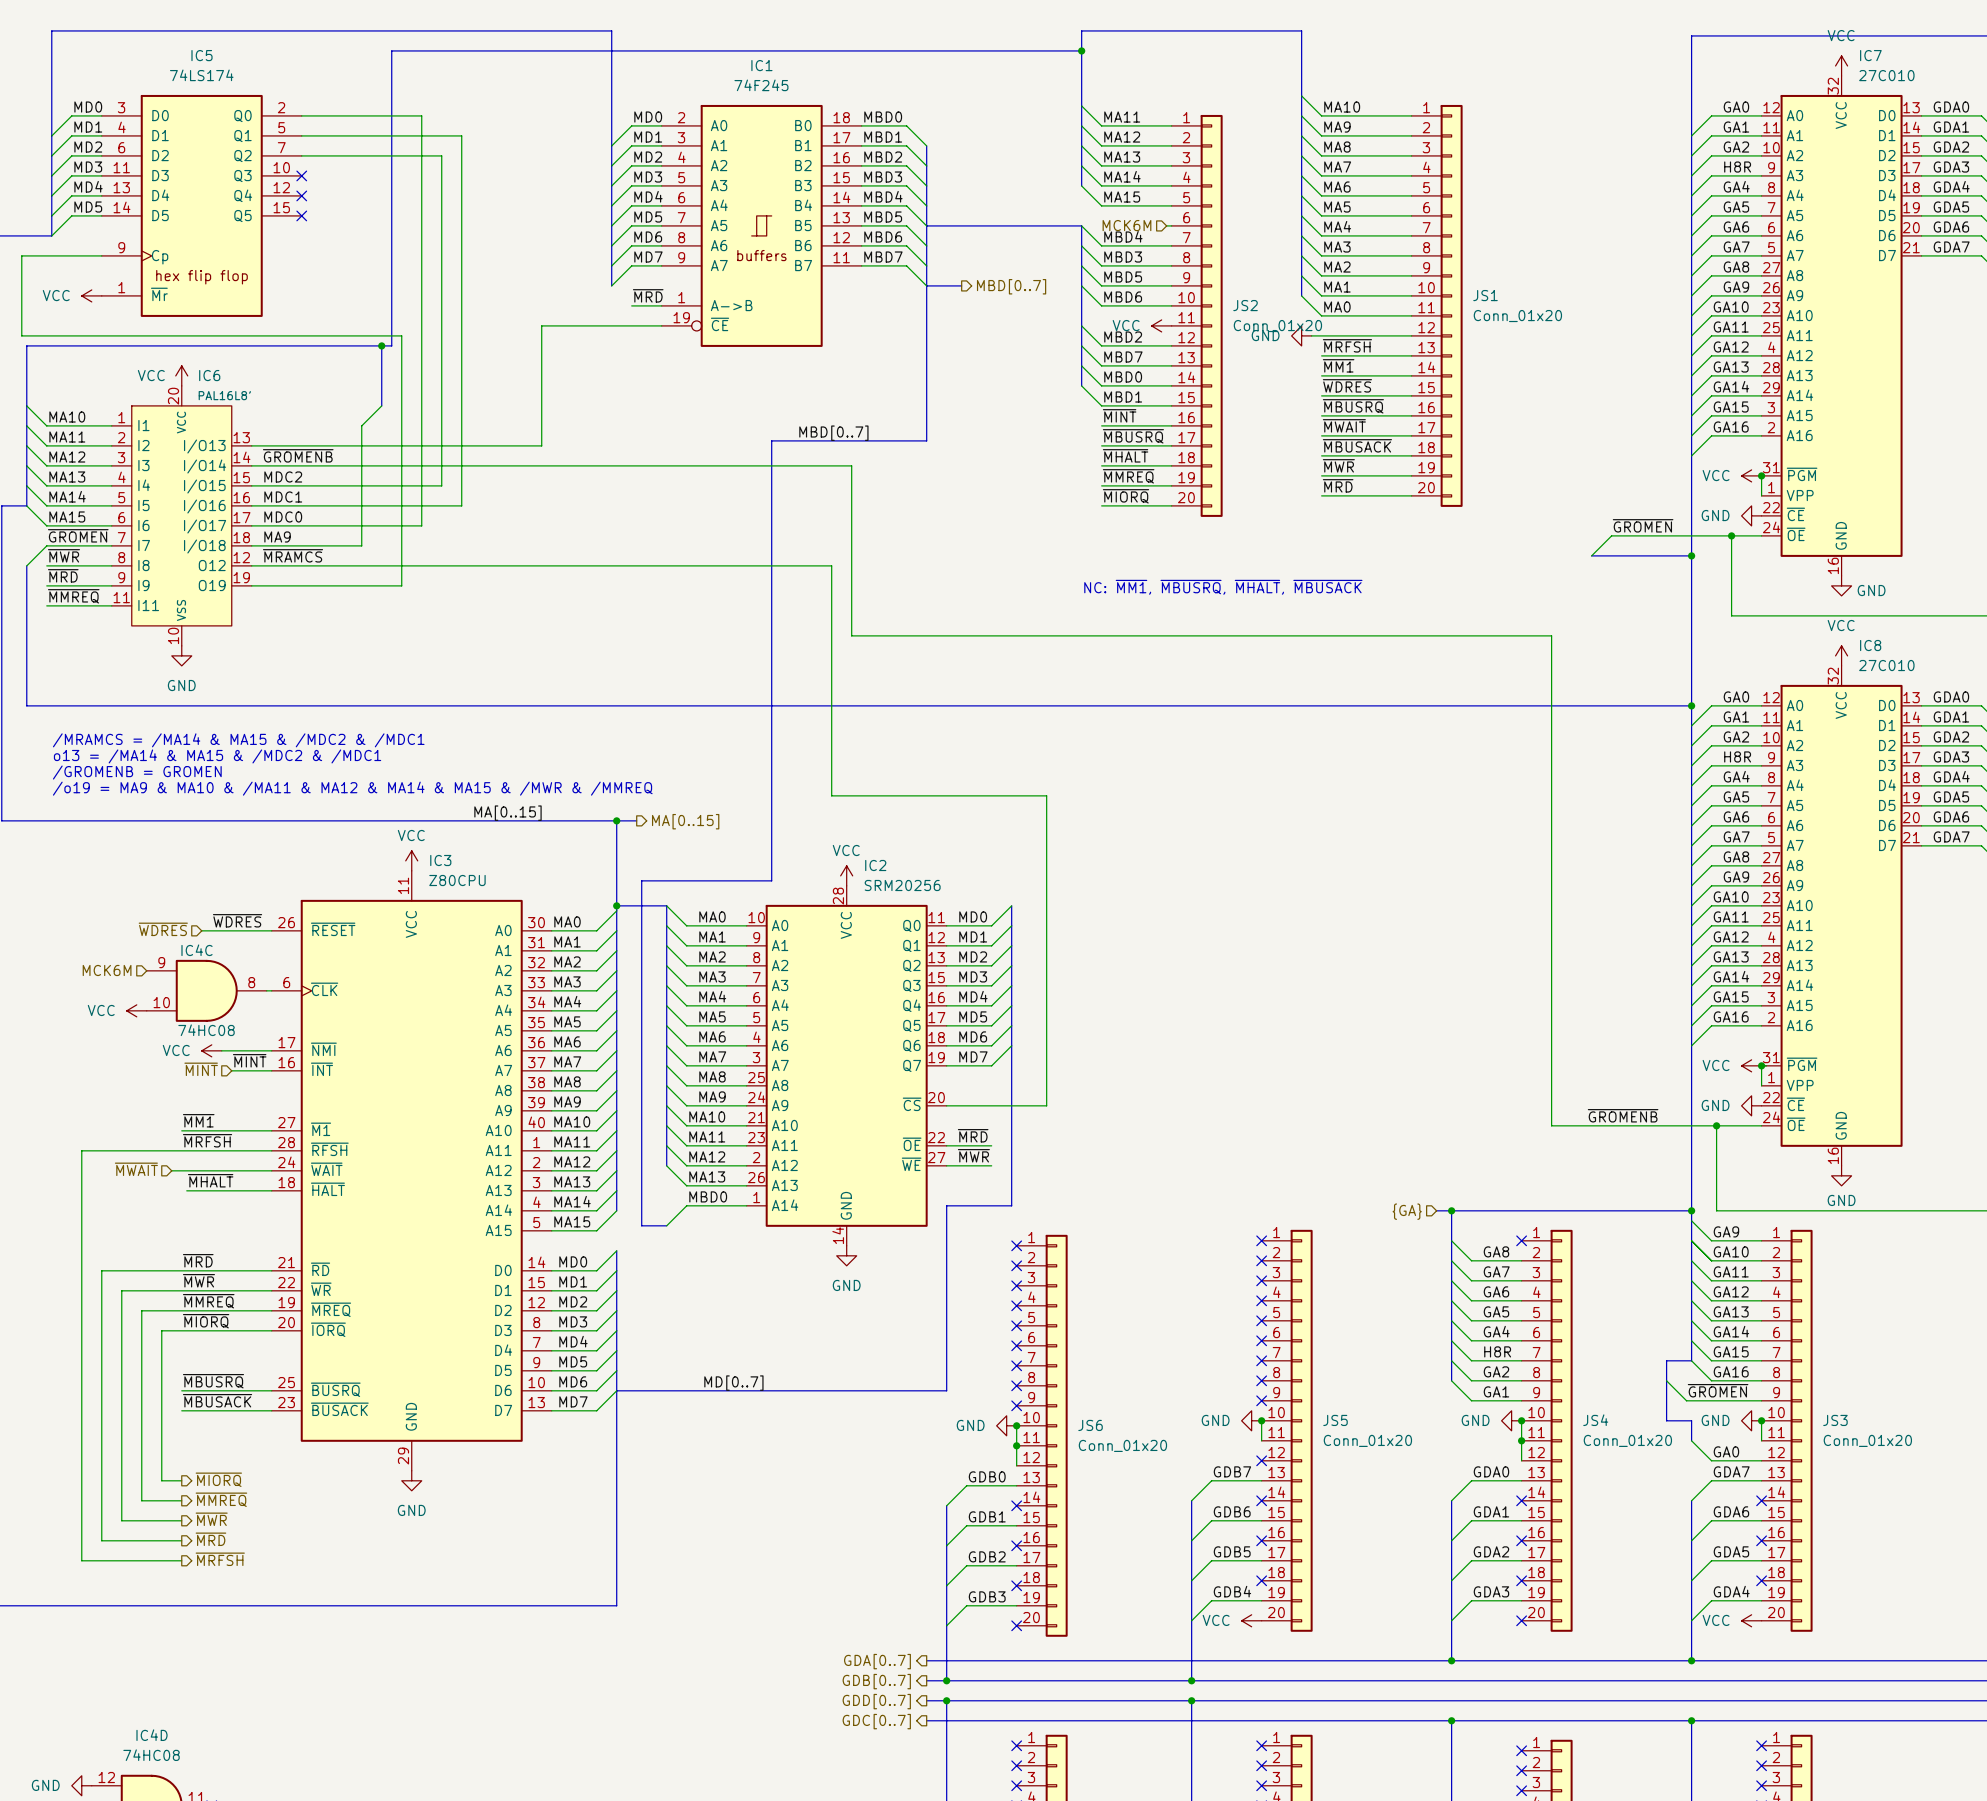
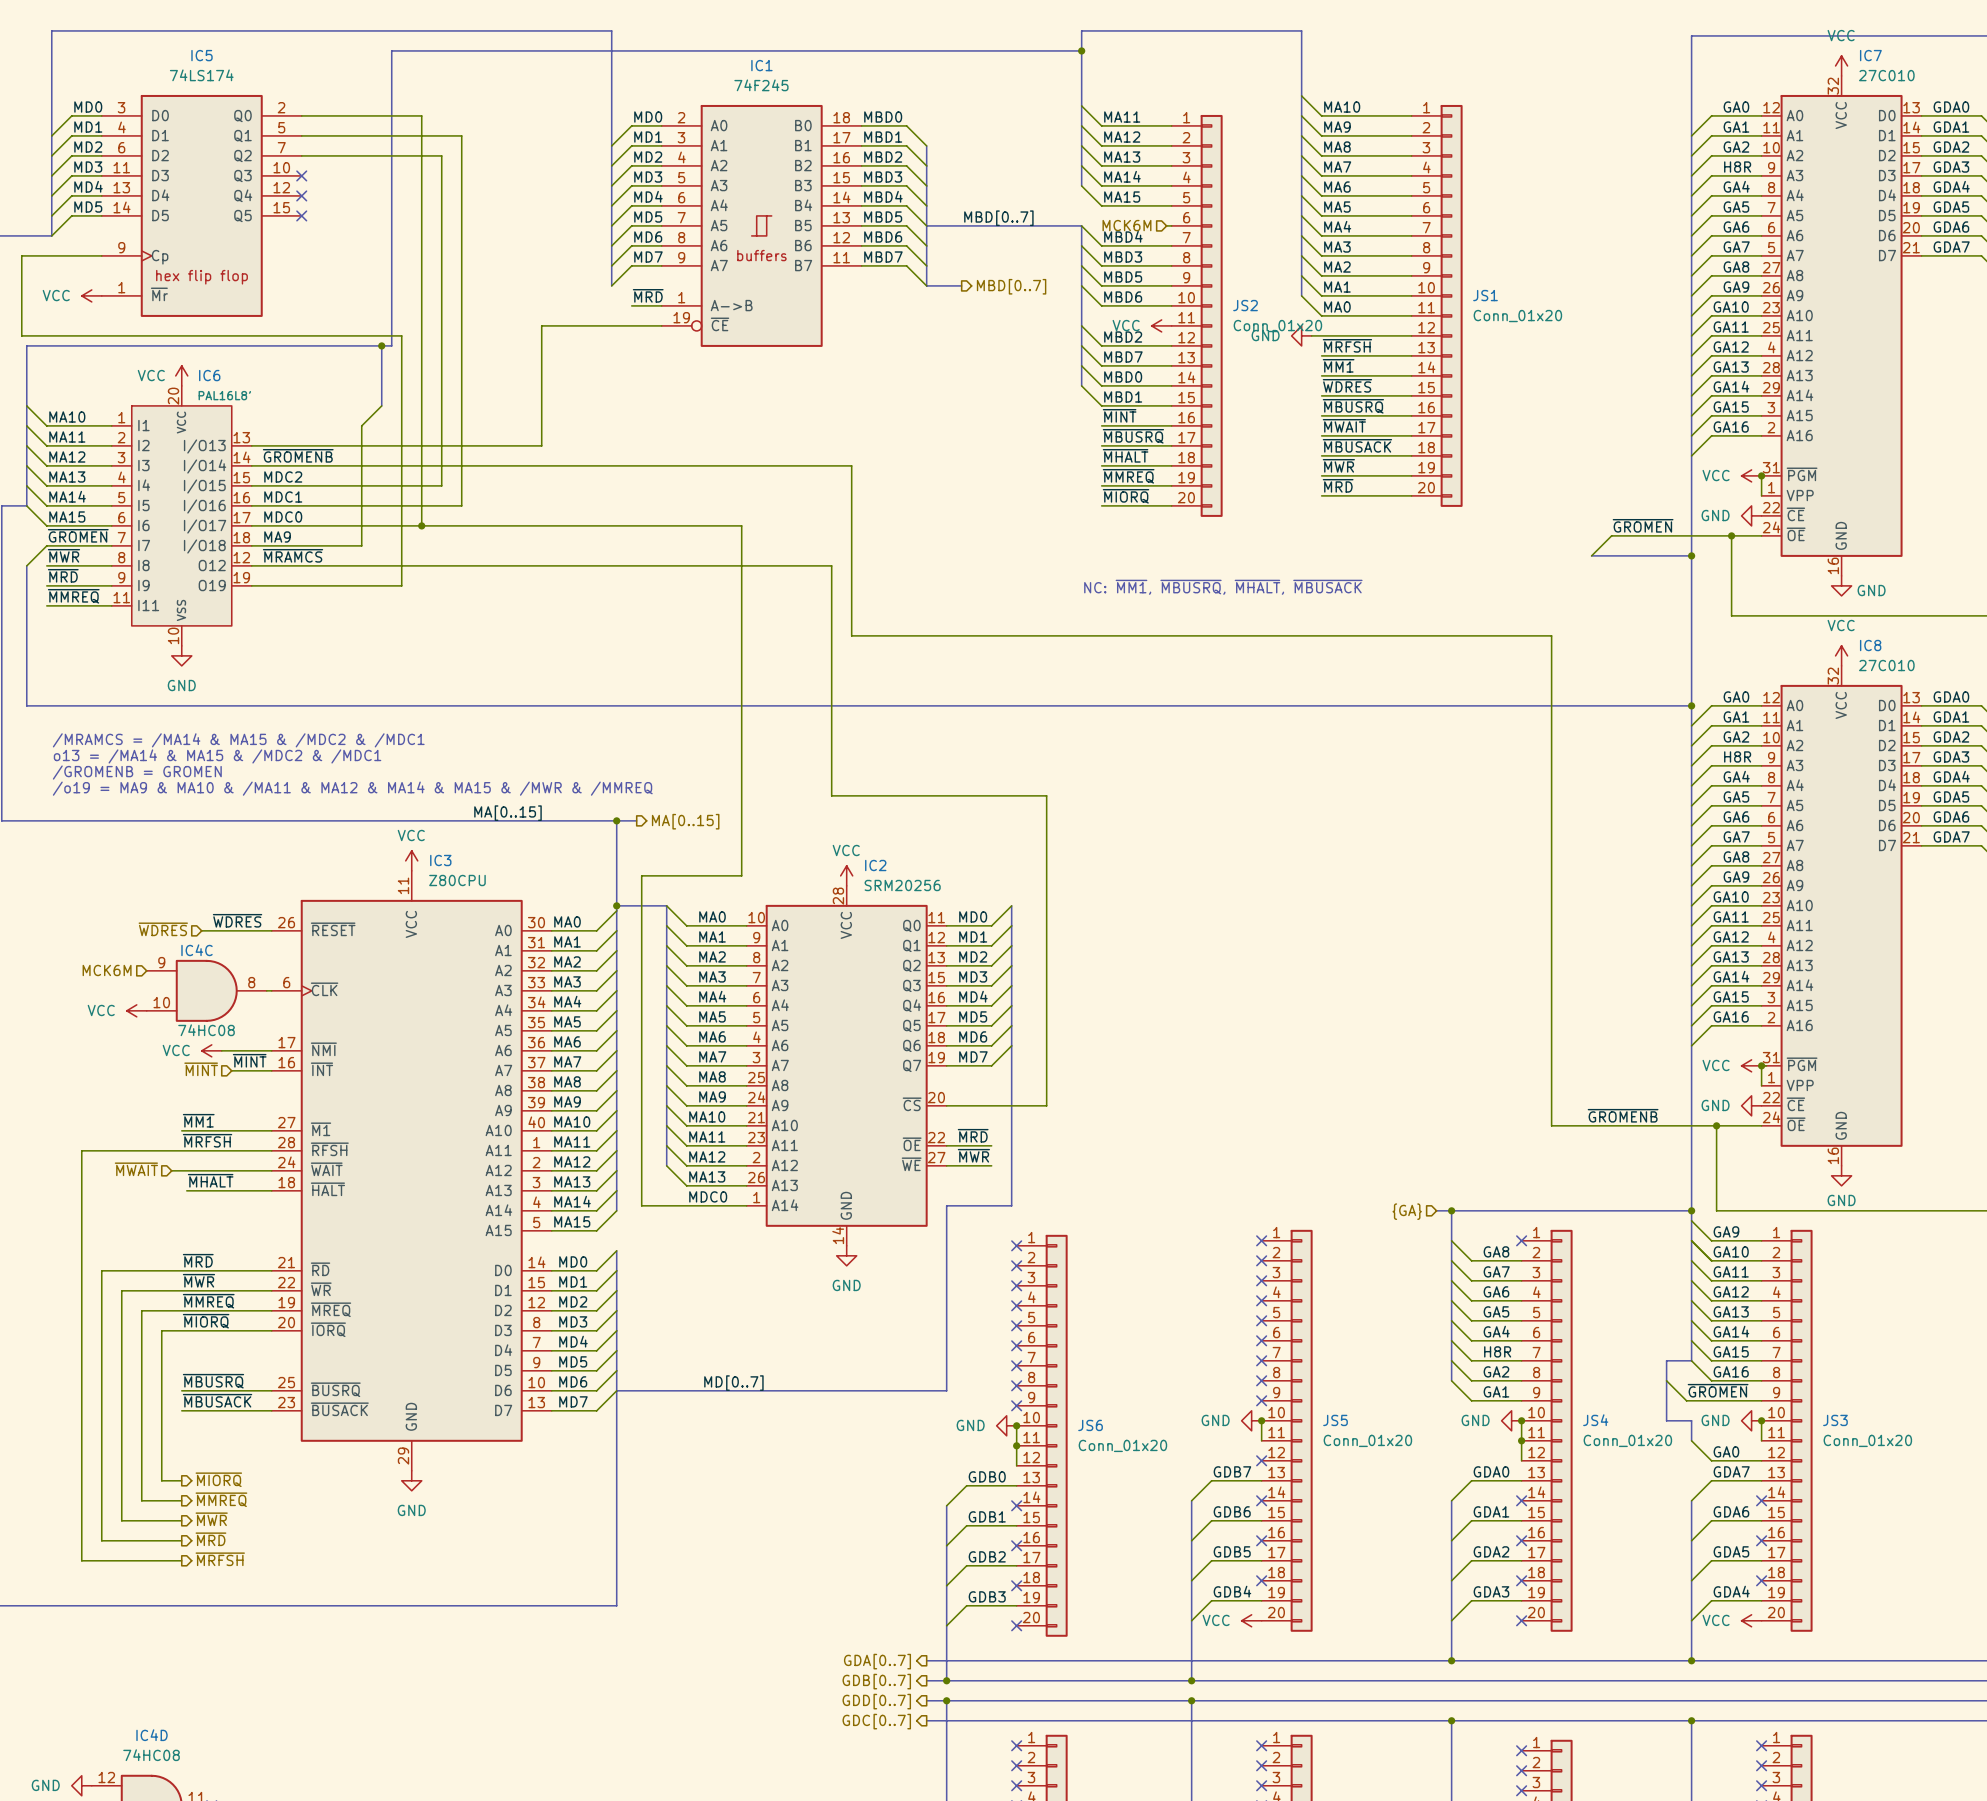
label: none -> MBD[0..7] (998, 218)
bus: (926, 285) (926, 440) (771, 440) (771, 880) (641, 880) (641, 1225) (666, 1225) -> none
label: MBD[0..7] (833, 433) -> none
junction: none -> (421, 525)
label: MBD0 (708, 1196) -> MDC0 (708, 1196)
wire: (686, 1205) (666, 1225) -> (686, 1205) (641, 1205) (641, 875) (741, 875) (741, 525) (421, 525)

